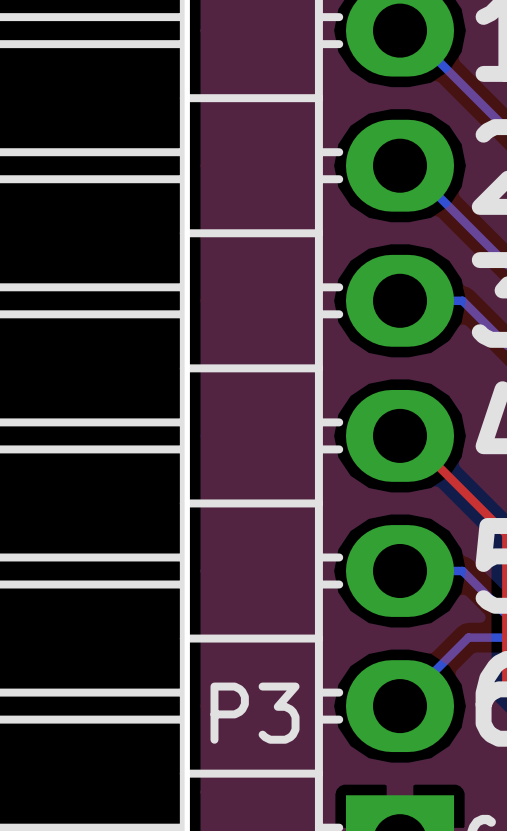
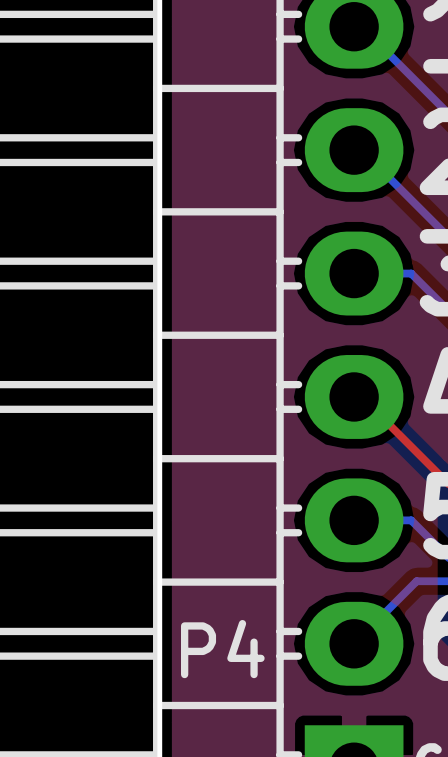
P3 name: P3 (255, 713) -> P4 (222, 649)

